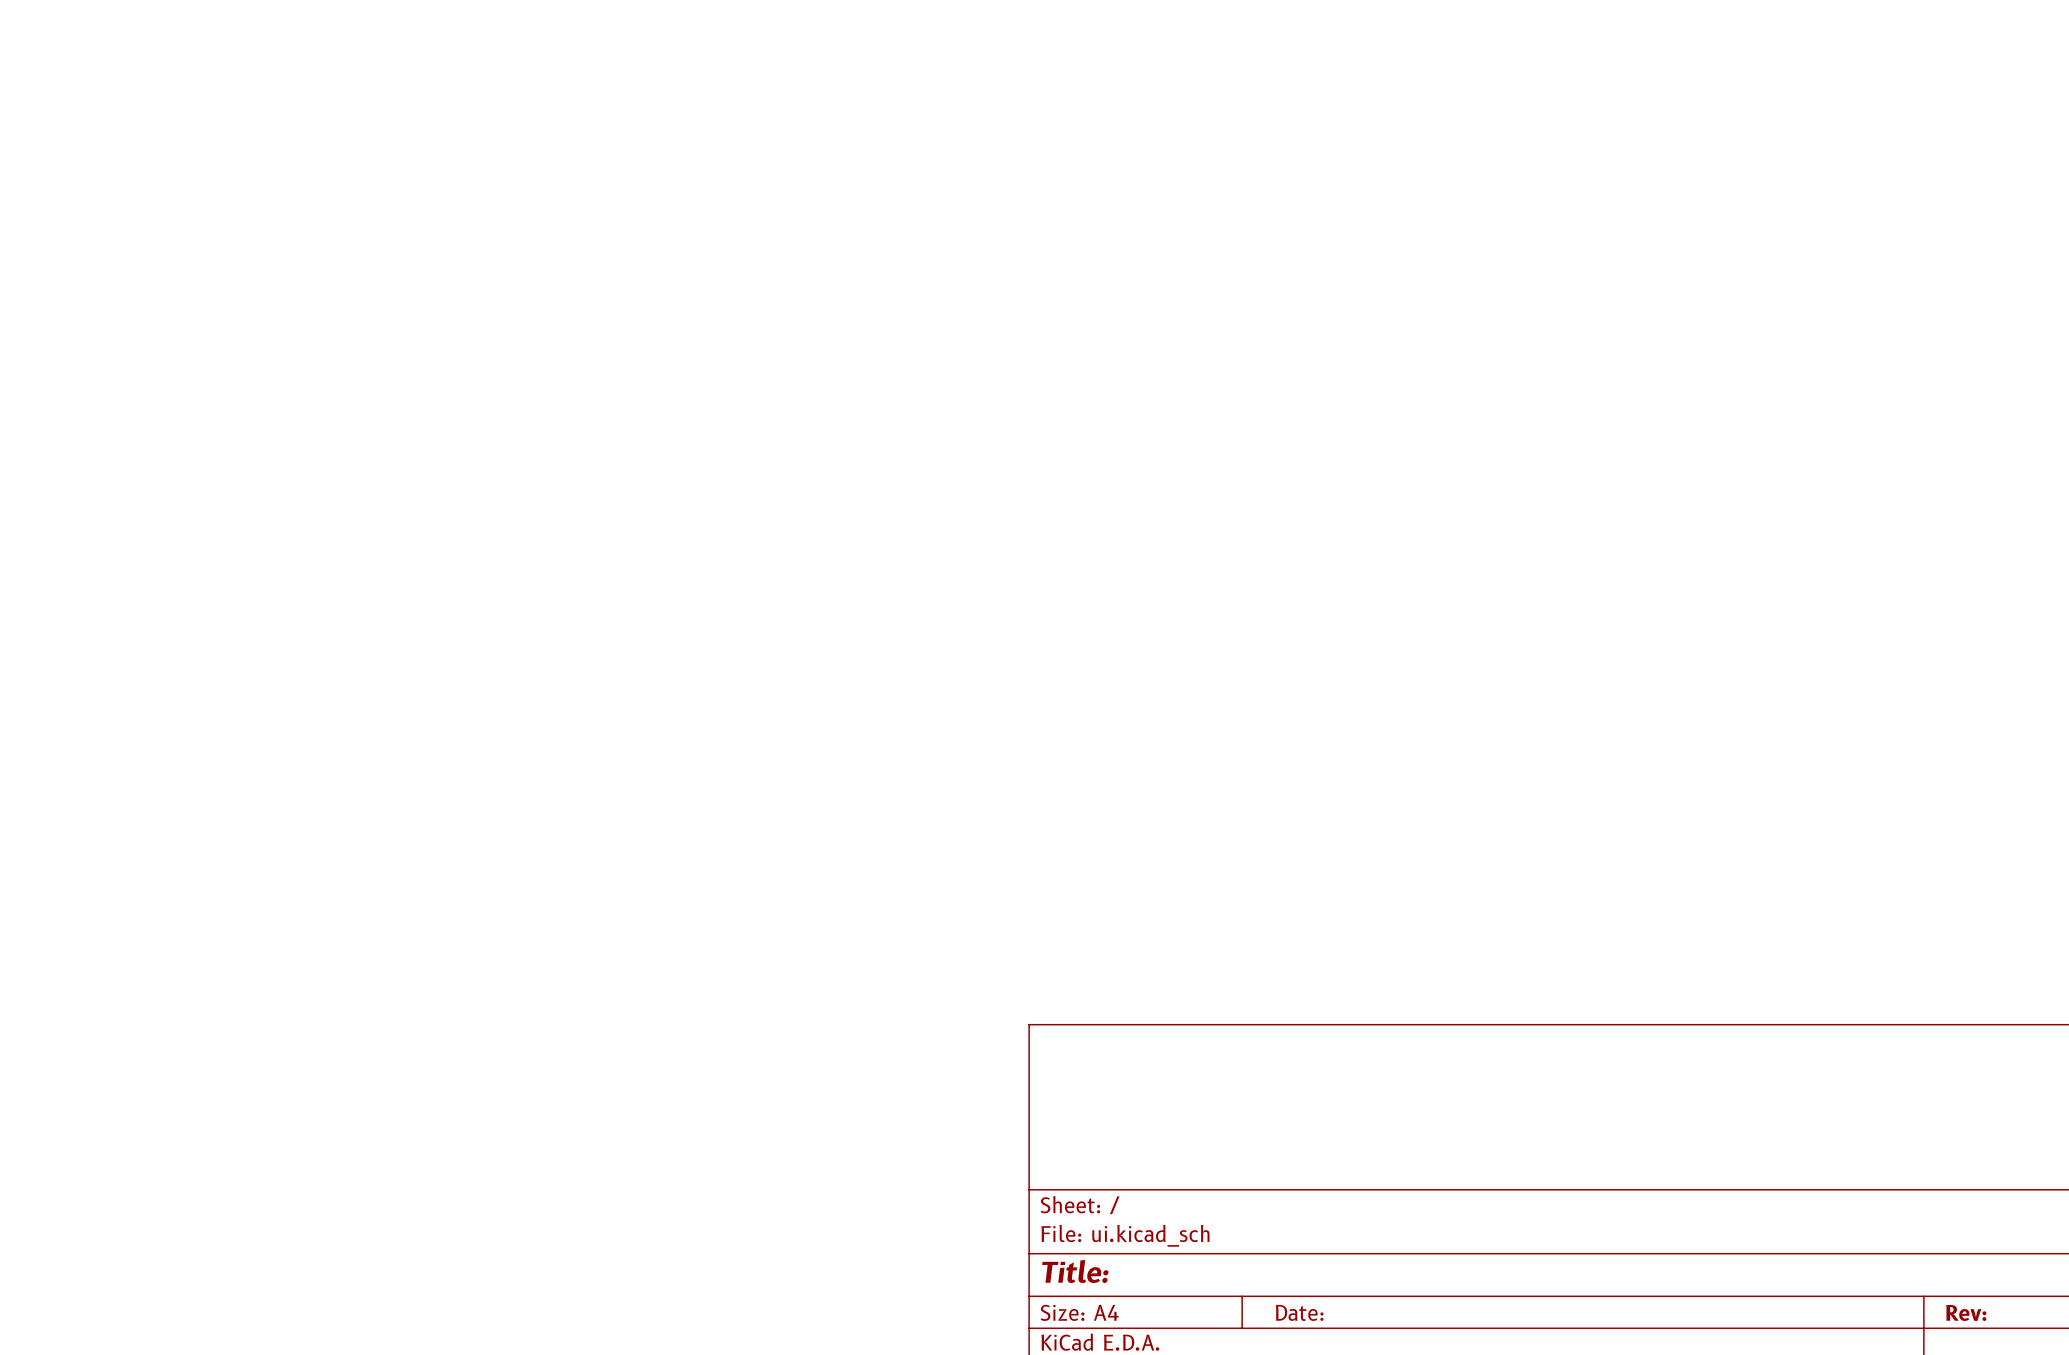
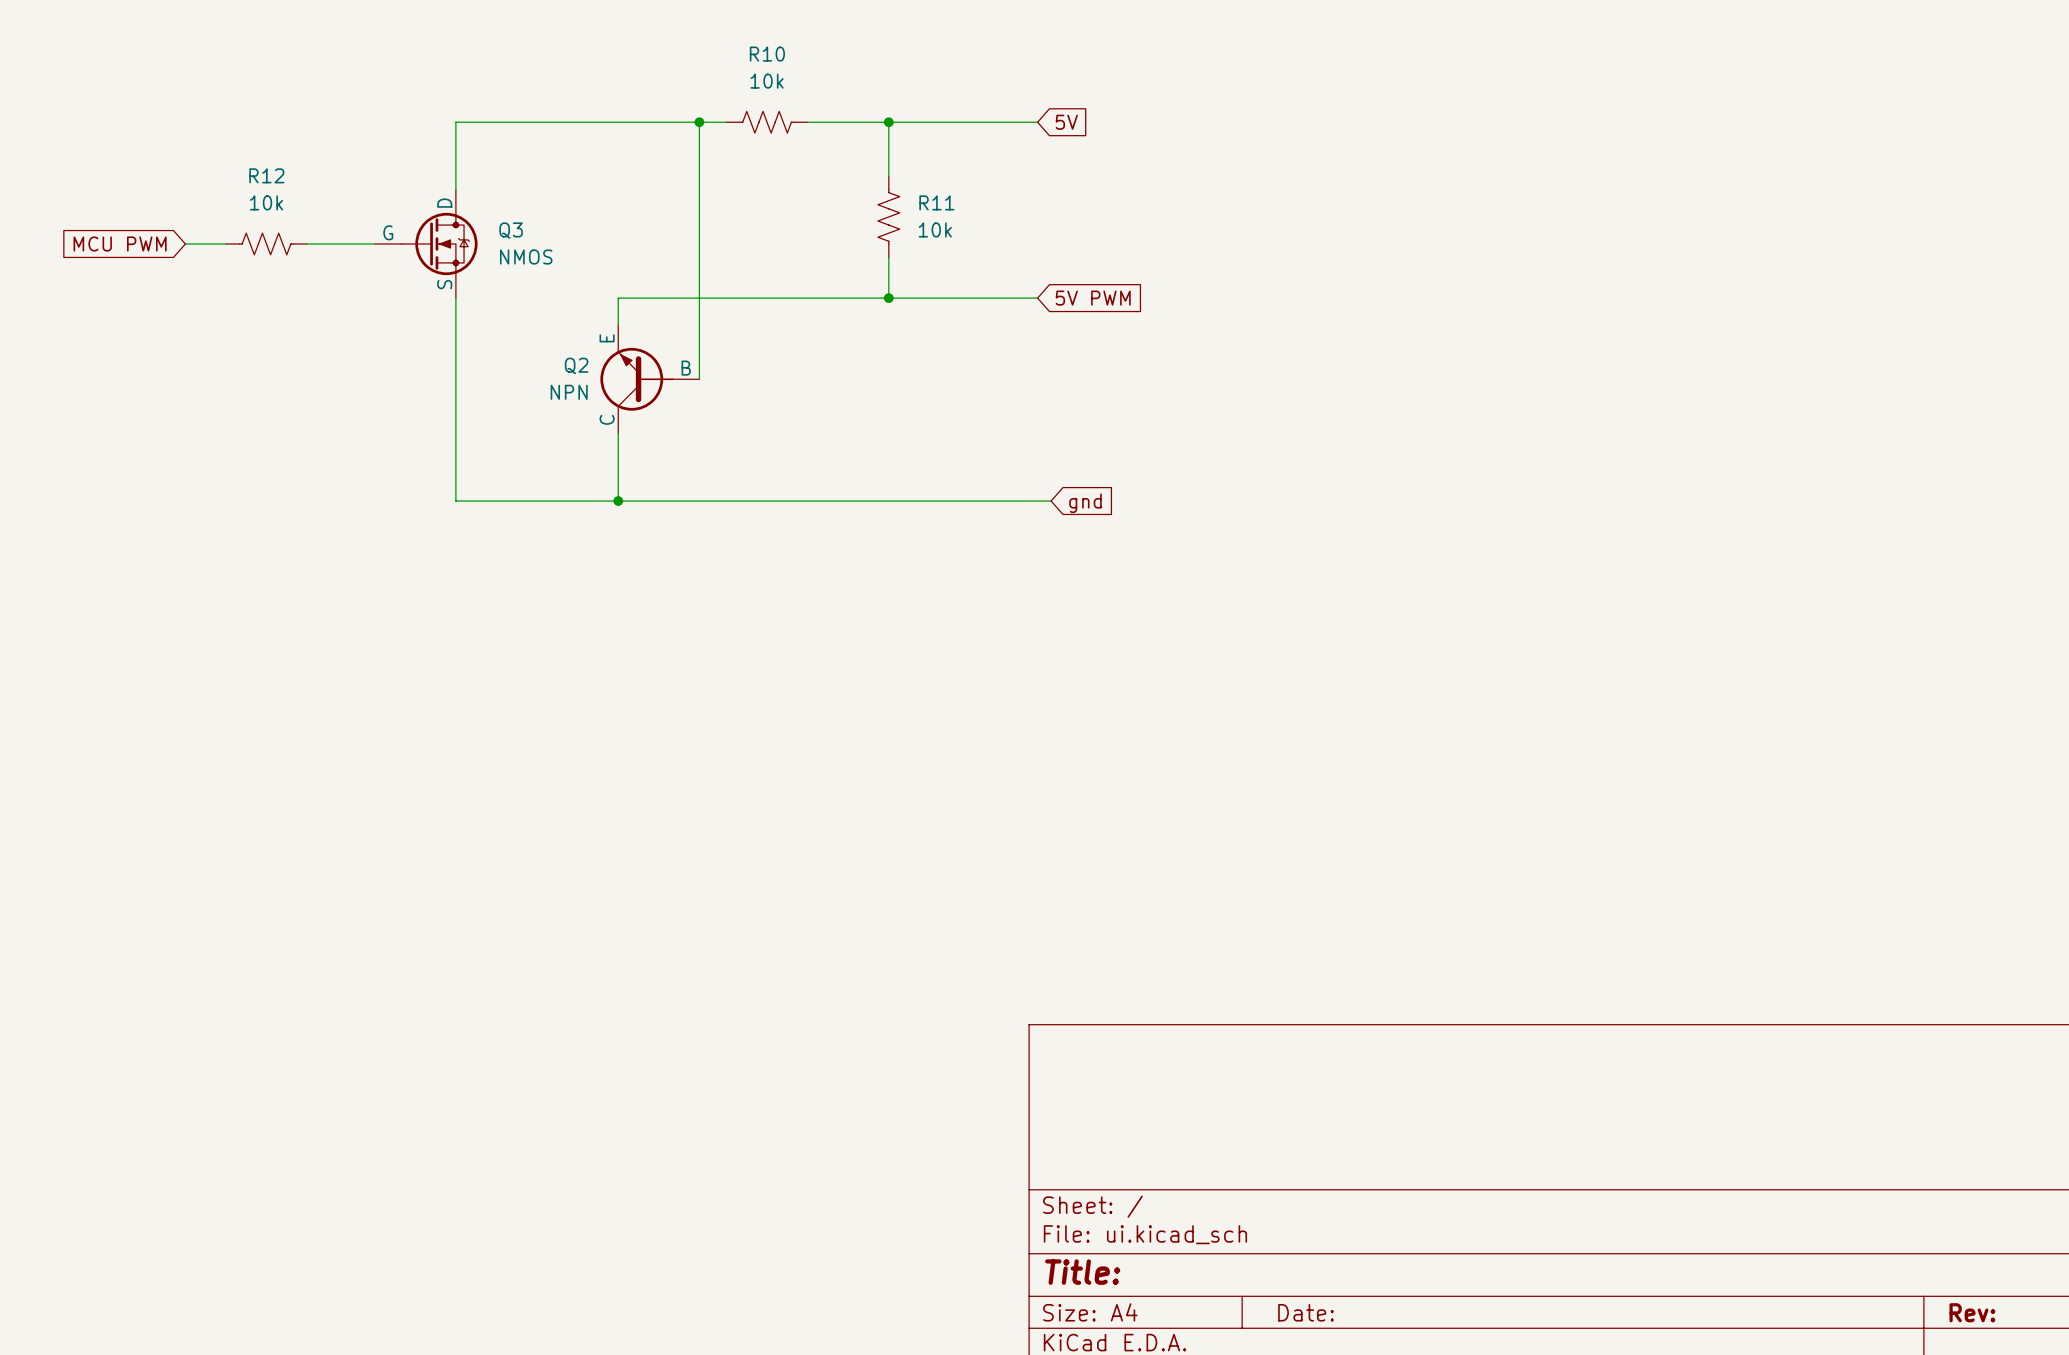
wire: none -> (699, 122) (699, 379)
junction: none -> (699, 122)
wire: none -> (726, 122) (455, 122) (455, 189)
R10: none -> 10k (767, 122)
wire: none -> (807, 122) (1037, 122)
wire: none -> (888, 122) (888, 176)
junction: none -> (888, 122)
global label: none -> 5V (1066, 122)
R11: none -> 10k (888, 216)
wire: none -> (185, 243) (225, 243)
R12: none -> 10k (266, 243)
wire: none -> (307, 243) (374, 243)
Q3: none -> NMOS (426, 243)
global label: none -> MCU PWM (120, 243)
wire: none -> (888, 257) (888, 298)
wire: none -> (455, 298) (455, 501) (1051, 501)
junction: none -> (888, 298)
wire: none -> (1037, 298) (618, 298) (618, 325)
global label: none -> 5V PWM (1093, 298)
Q2: none -> NPN (649, 379)
wire: none -> (618, 433) (618, 501)
junction: none -> (618, 501)
global label: none -> gnd (1085, 503)

